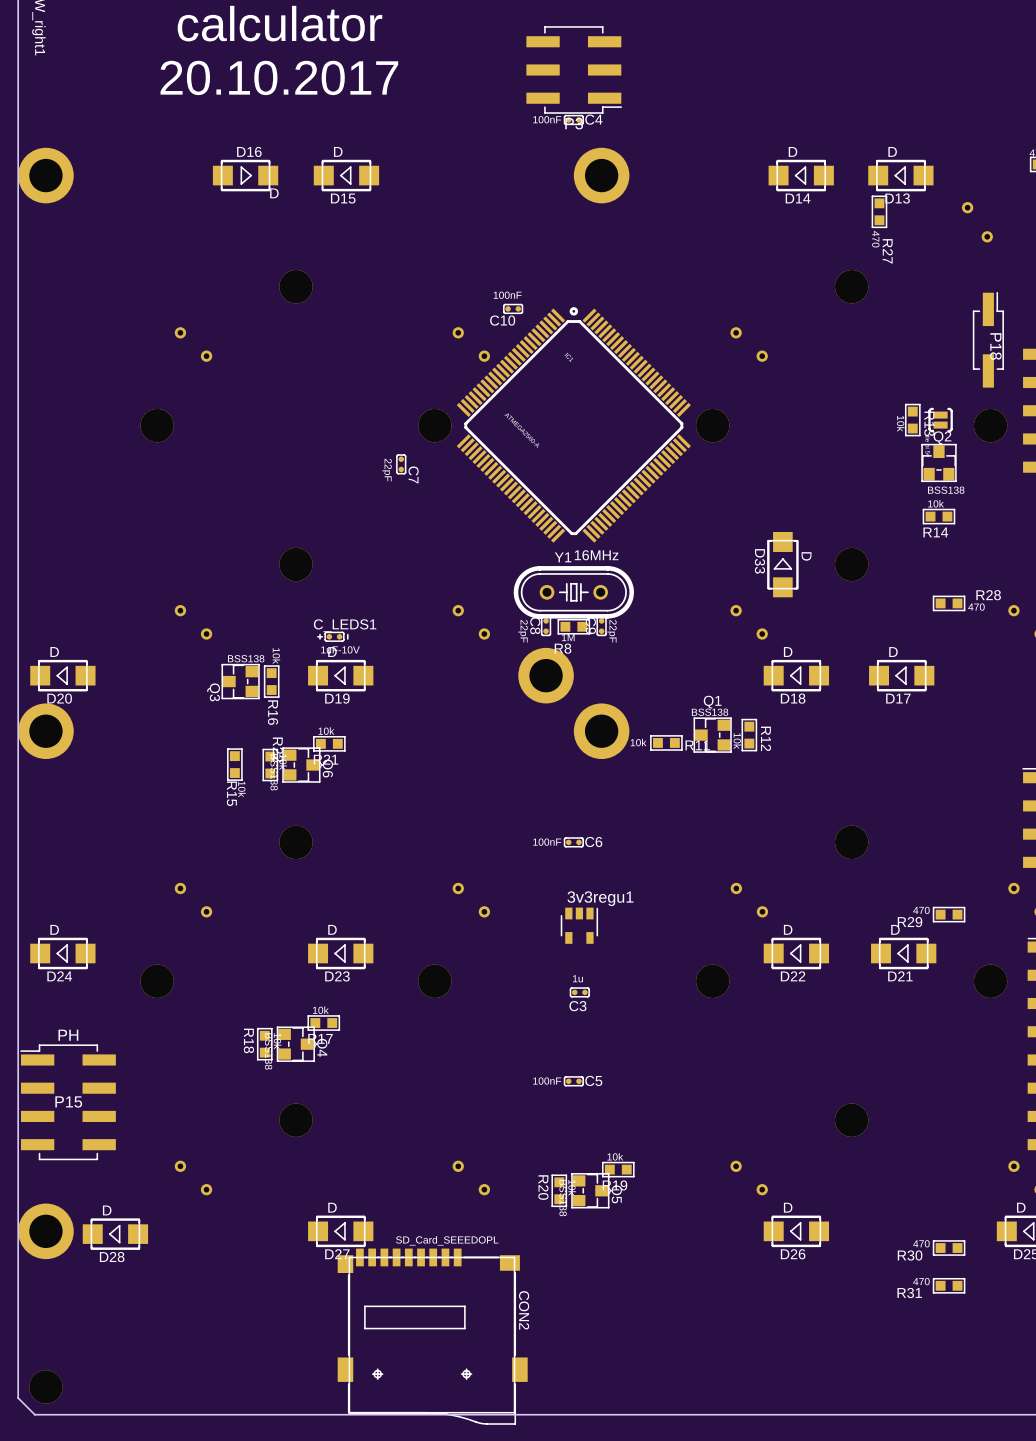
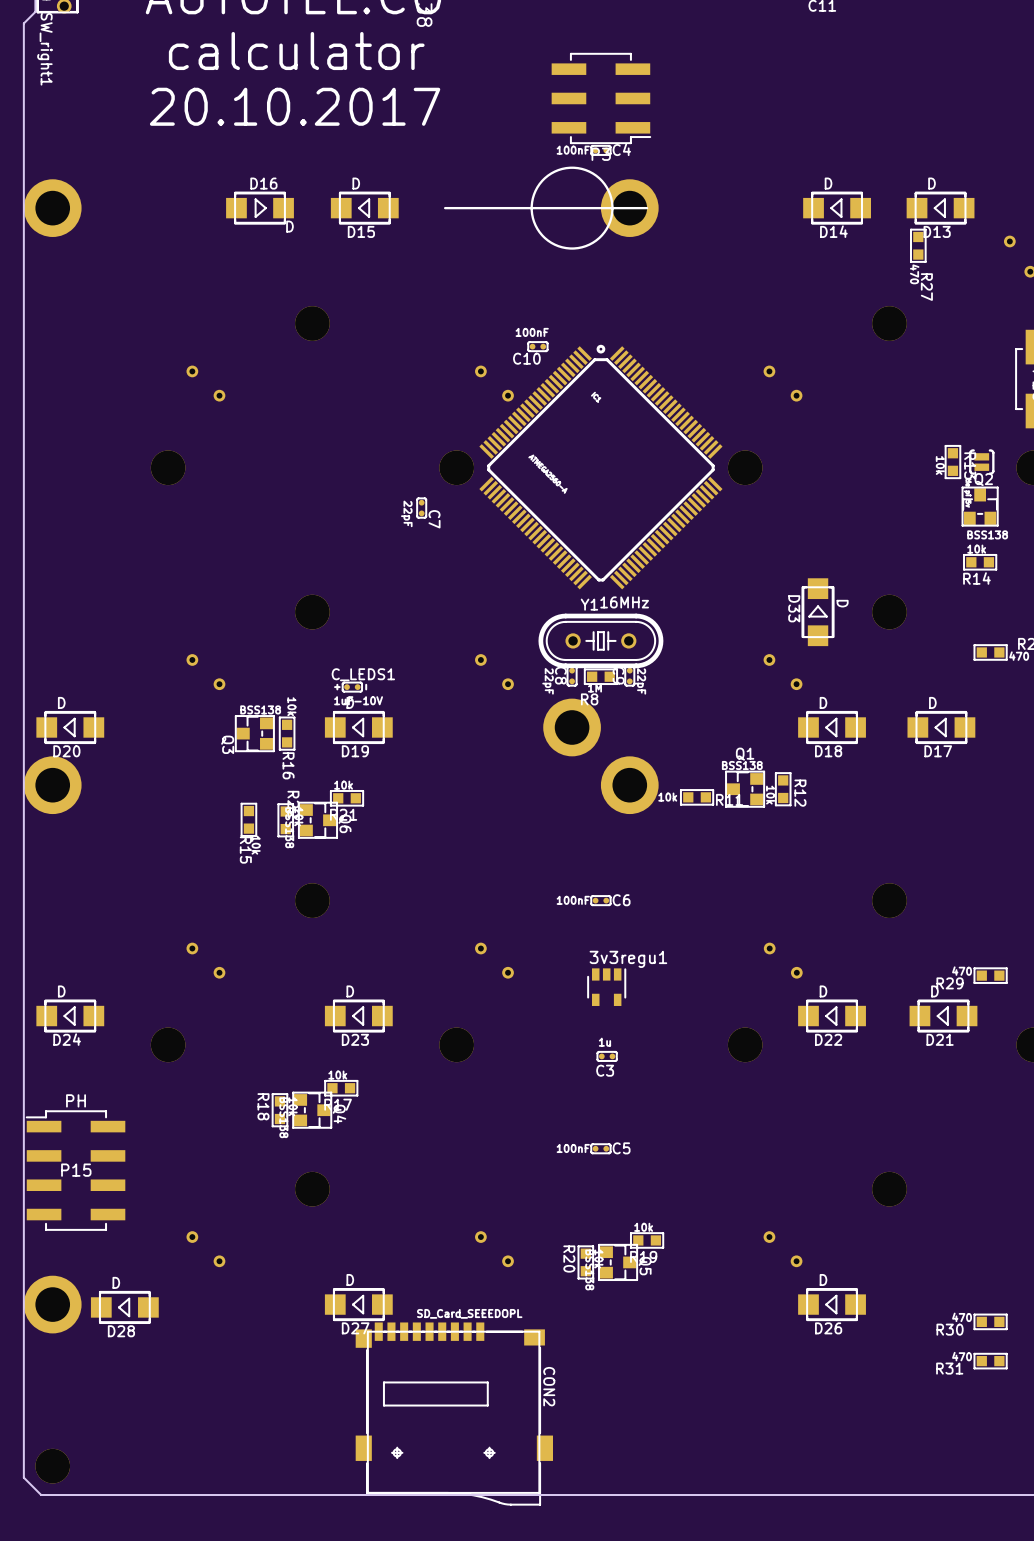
drawing: none -> [530, 166, 614, 250]
line: none -> (647, 208) (445, 208)

